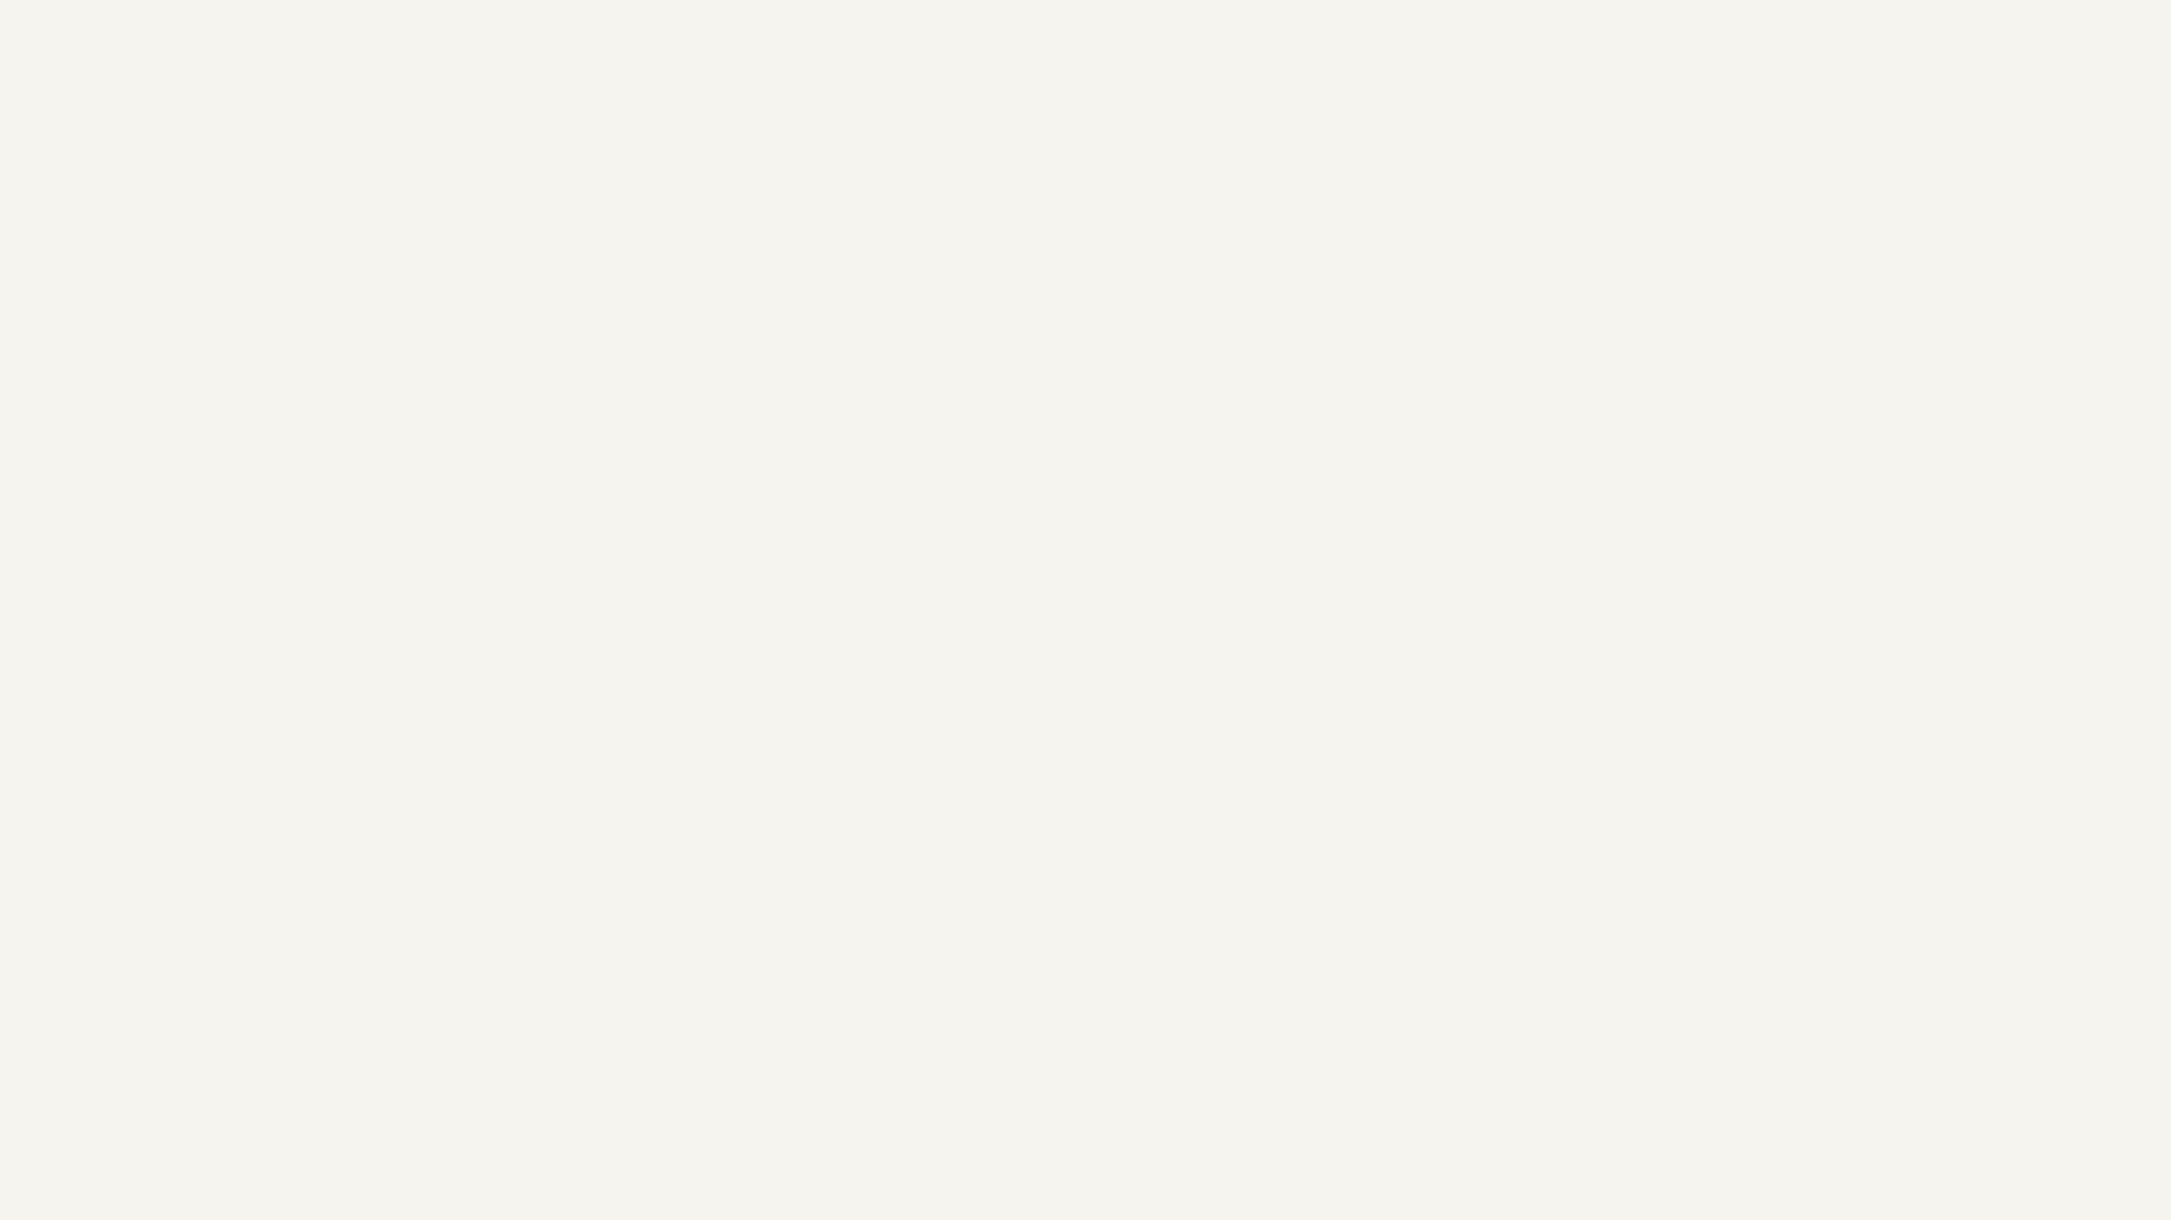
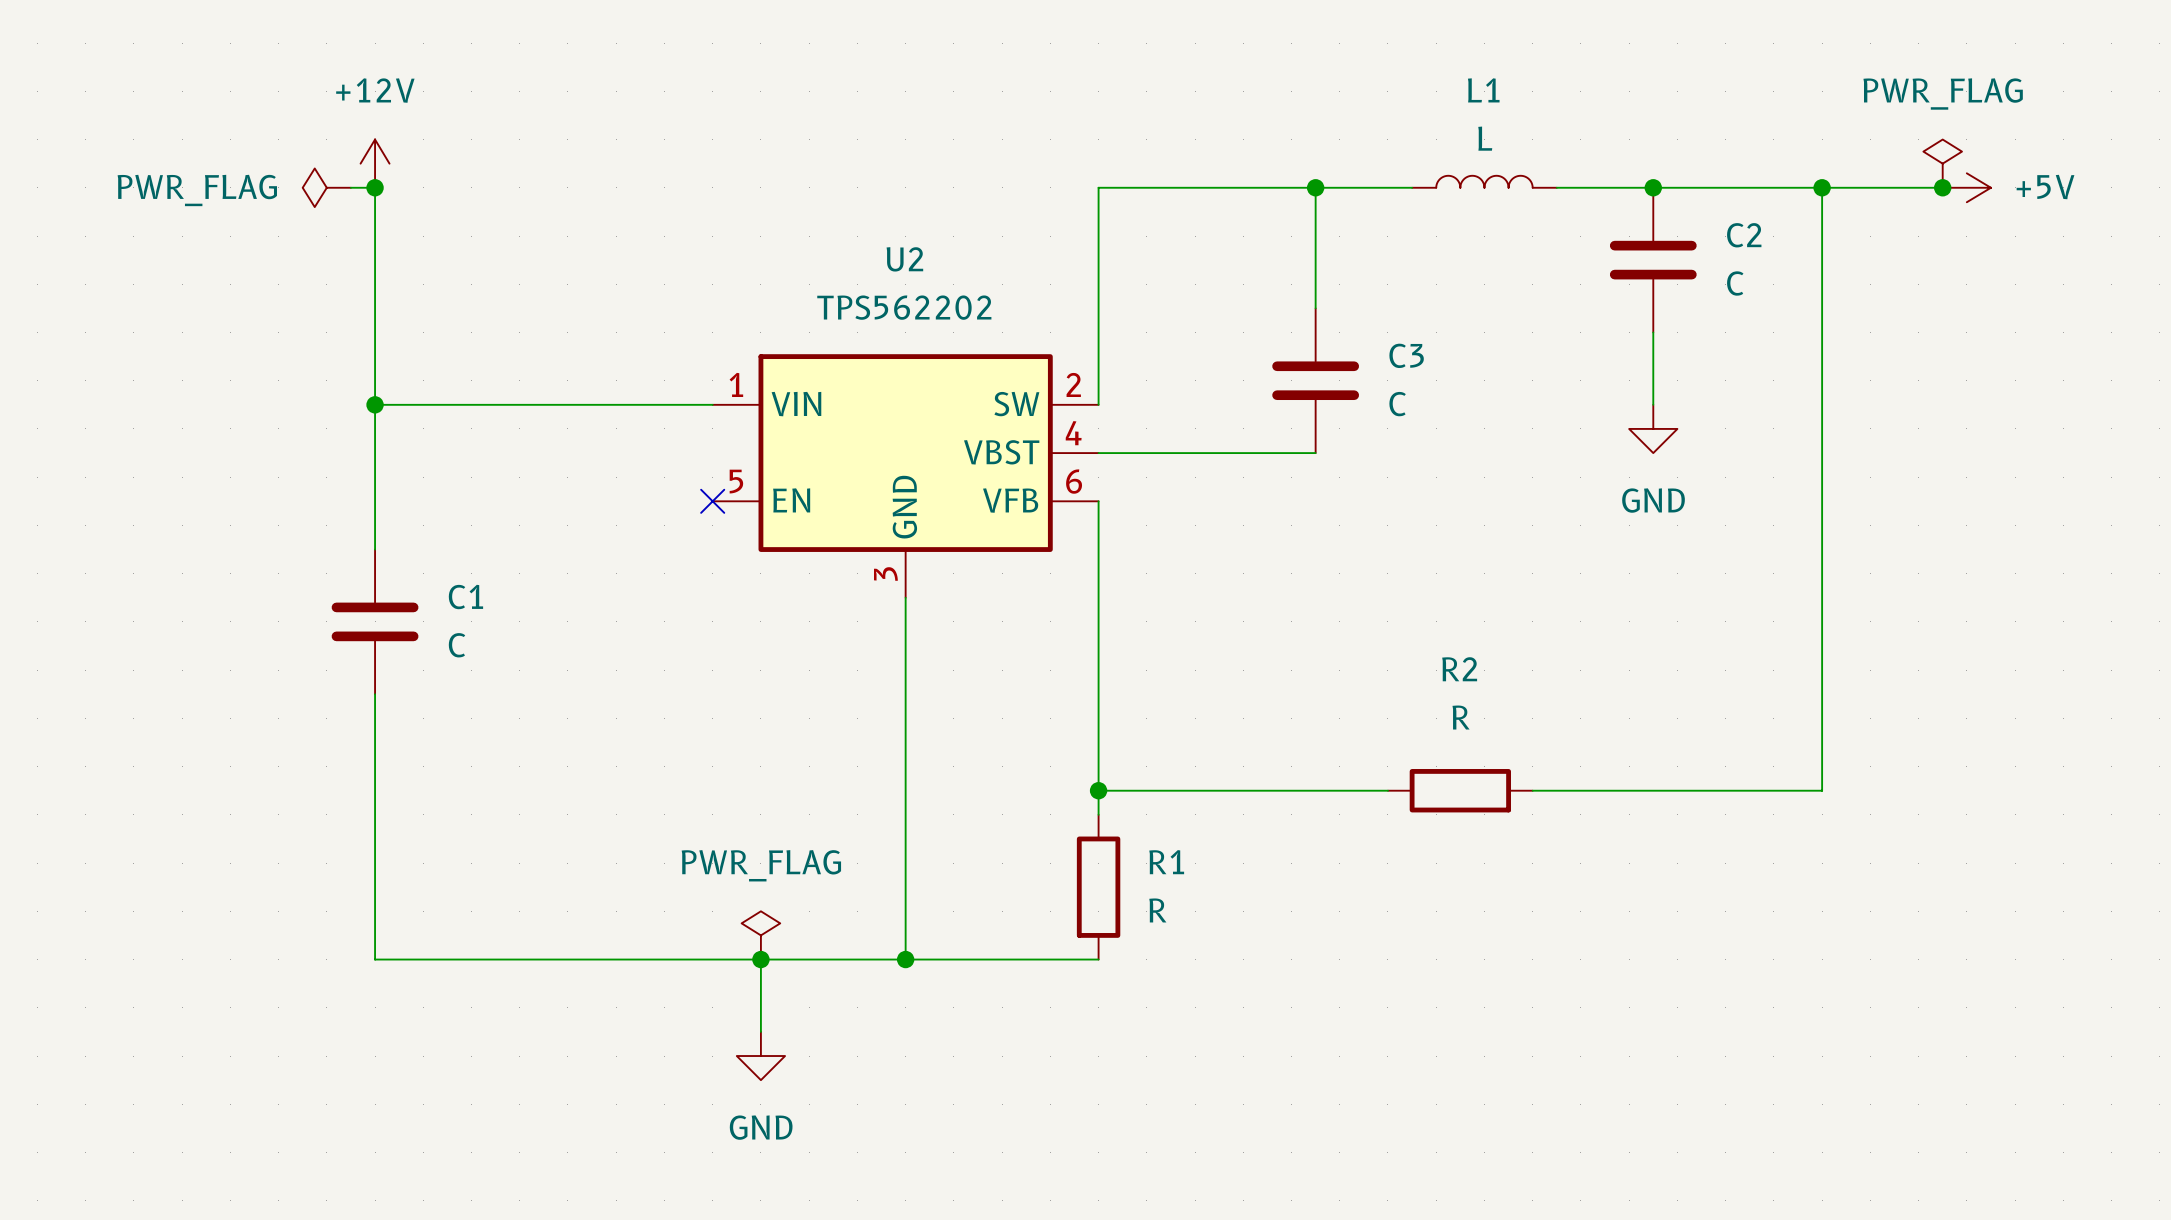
power symbol: none -> +12V (375, 163)
power symbol: none -> PWR_FLAG (1942, 163)
L1: none -> L (1484, 181)
power symbol: none -> PWR_FLAG (326, 187)
wire: none -> (350, 187) (375, 187) (375, 549)
junction: none -> (375, 187)
wire: none -> (1315, 187) (1315, 308)
junction: none -> (1315, 187)
wire: none -> (1412, 187) (1098, 187) (1098, 404)
wire: none -> (1556, 187) (1942, 187)
junction: none -> (1653, 187)
wire: none -> (1822, 187) (1822, 790) (1532, 790)
junction: none -> (1822, 187)
junction: none -> (1942, 187)
power symbol: none -> +5V (1966, 187)
C2: none -> C (1653, 260)
wire: none -> (1653, 332) (1653, 404)
C3: none -> C (1315, 380)
wire: none -> (375, 404) (712, 404)
junction: none -> (375, 404)
power symbol: none -> GND (1653, 428)
wire: none -> (1098, 453) (1315, 453)
U2: none -> TPS562202 (905, 475)
no-connect mark: none -> (712, 501)
wire: none -> (1098, 501) (1098, 814)
wire: none -> (905, 597) (905, 959)
C1: none -> C (375, 621)
wire: none -> (375, 694) (375, 959) (1098, 959)
wire: none -> (1098, 790) (1387, 790)
junction: none -> (1098, 790)
R2: none -> R (1460, 790)
R1: none -> R (1098, 887)
power symbol: none -> PWR_FLAG (760, 935)
wire: none -> (760, 959) (760, 1031)
junction: none -> (760, 959)
junction: none -> (905, 959)
power symbol: none -> GND (760, 1056)

